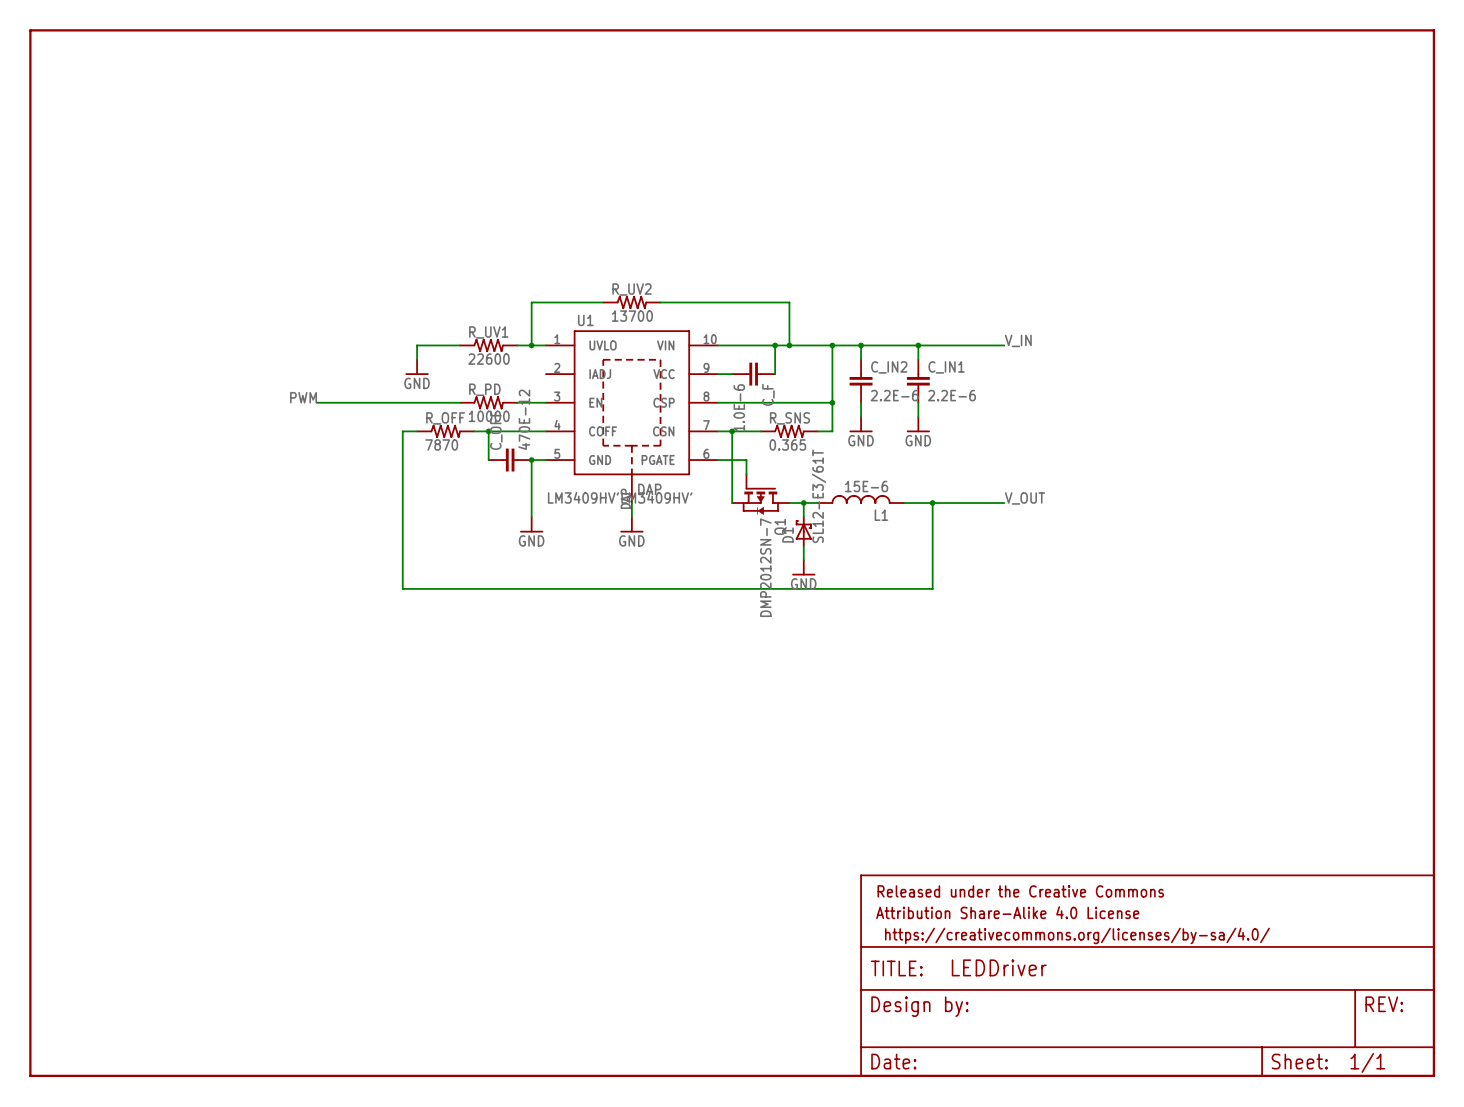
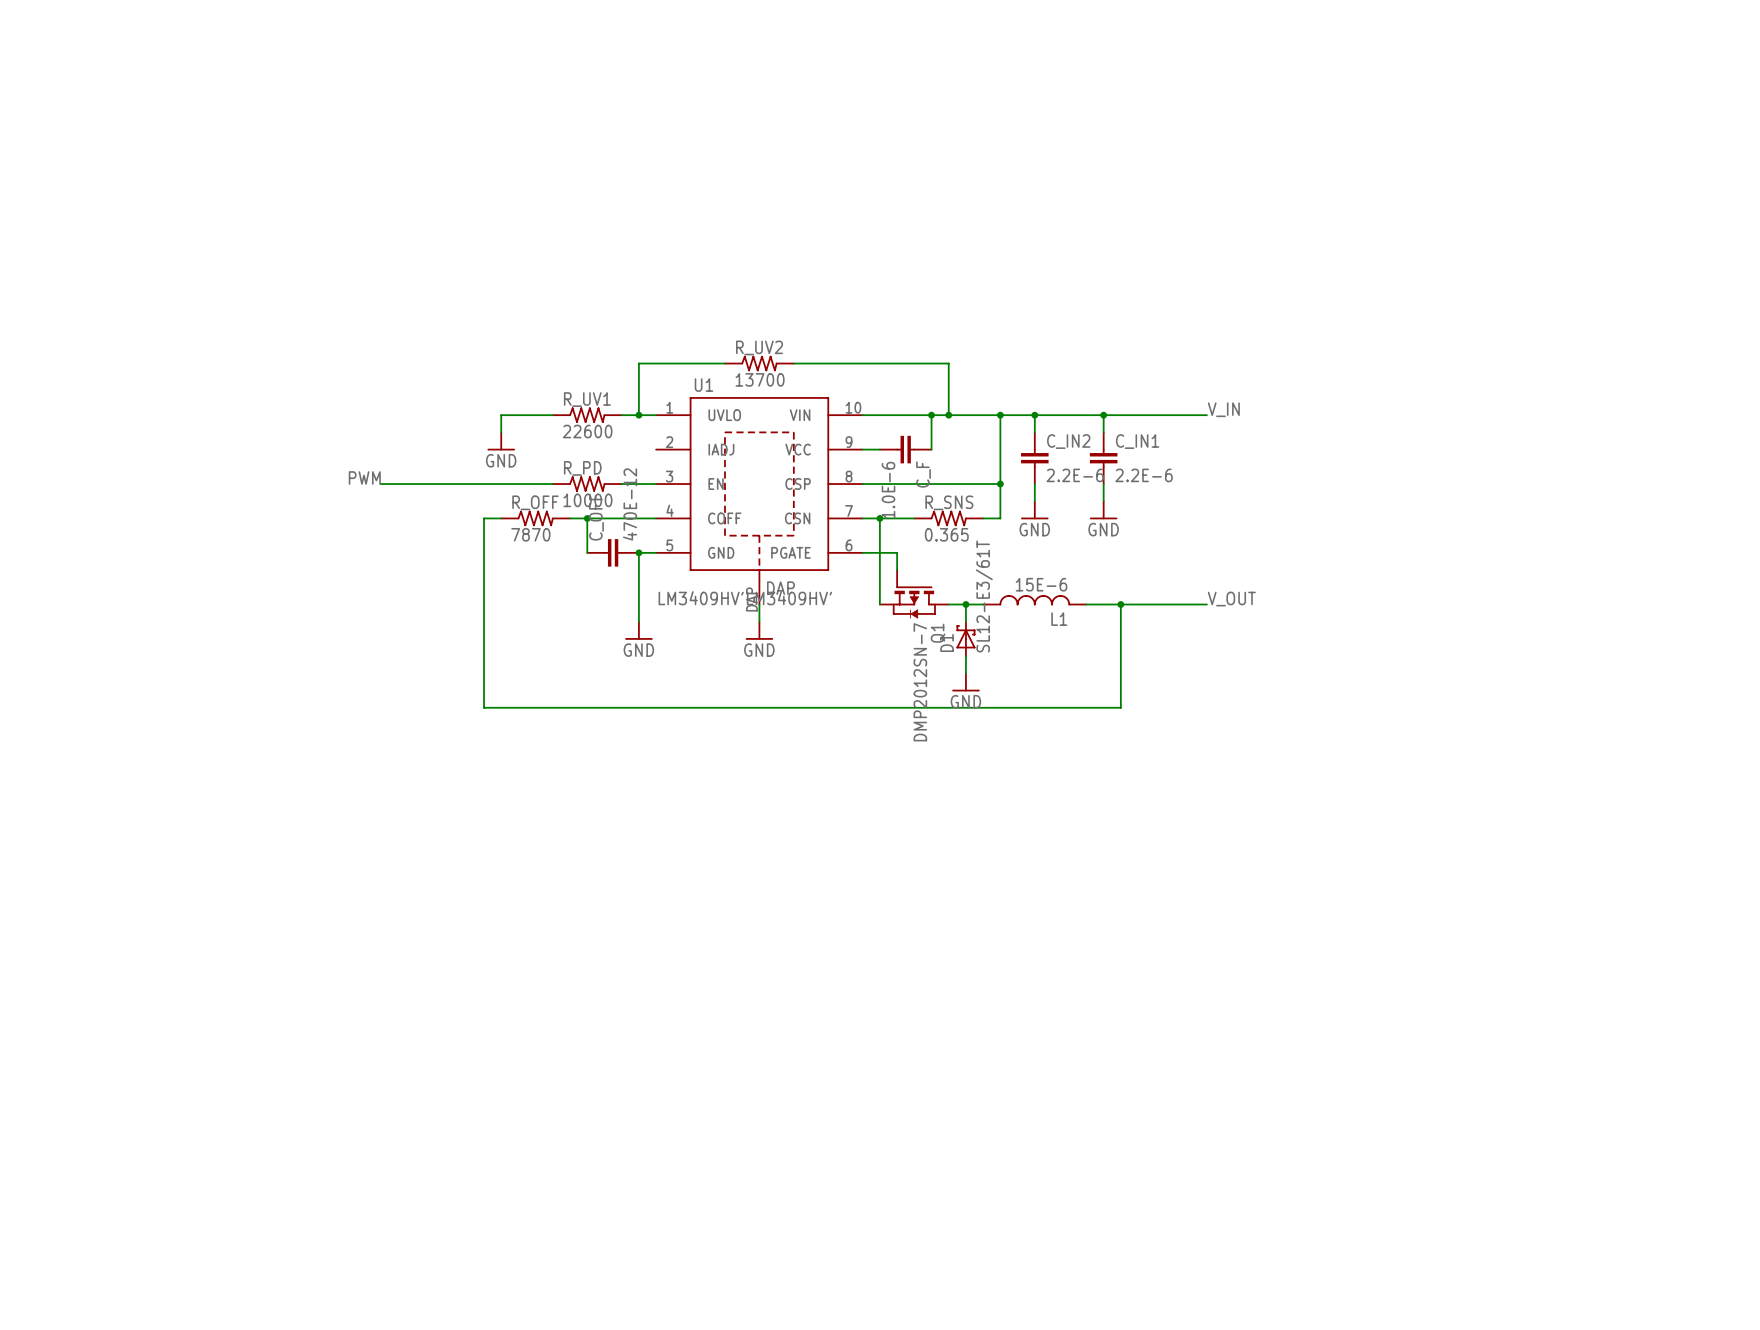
part: (732, 553) -> none
part: (1147, 975) -> none

